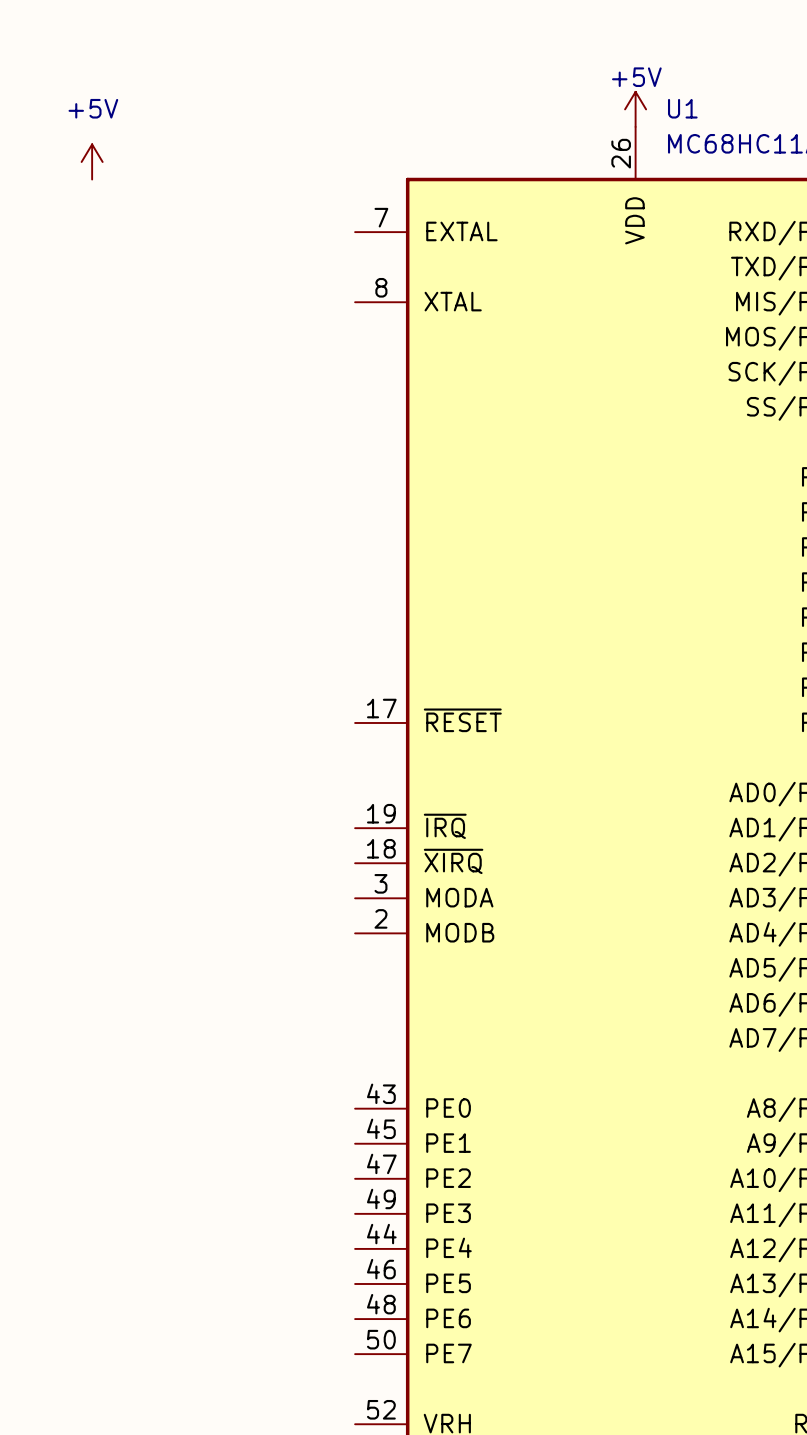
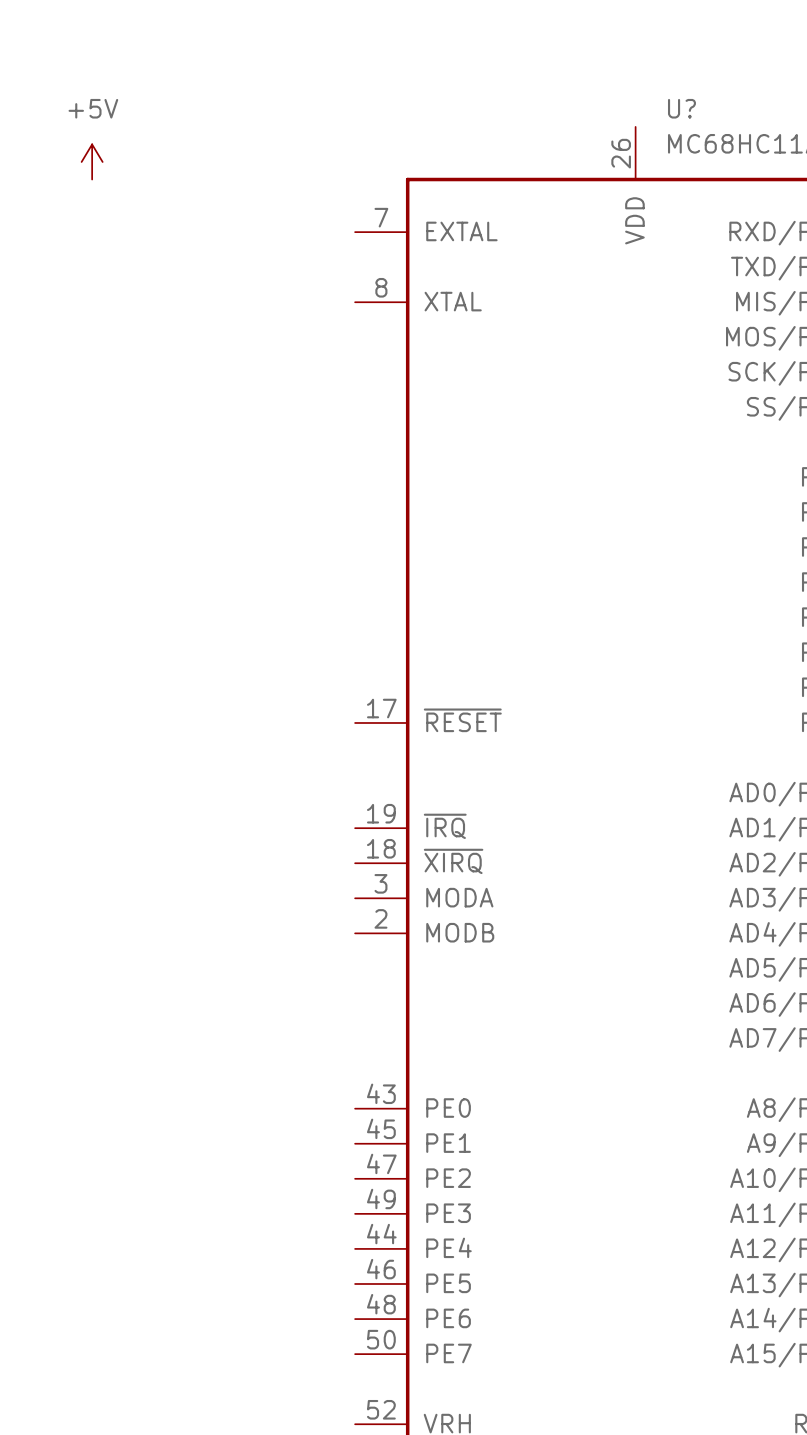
U1 name: U1 (682, 108) -> U? (681, 108)
power symbol: +5V (635, 109) -> none

